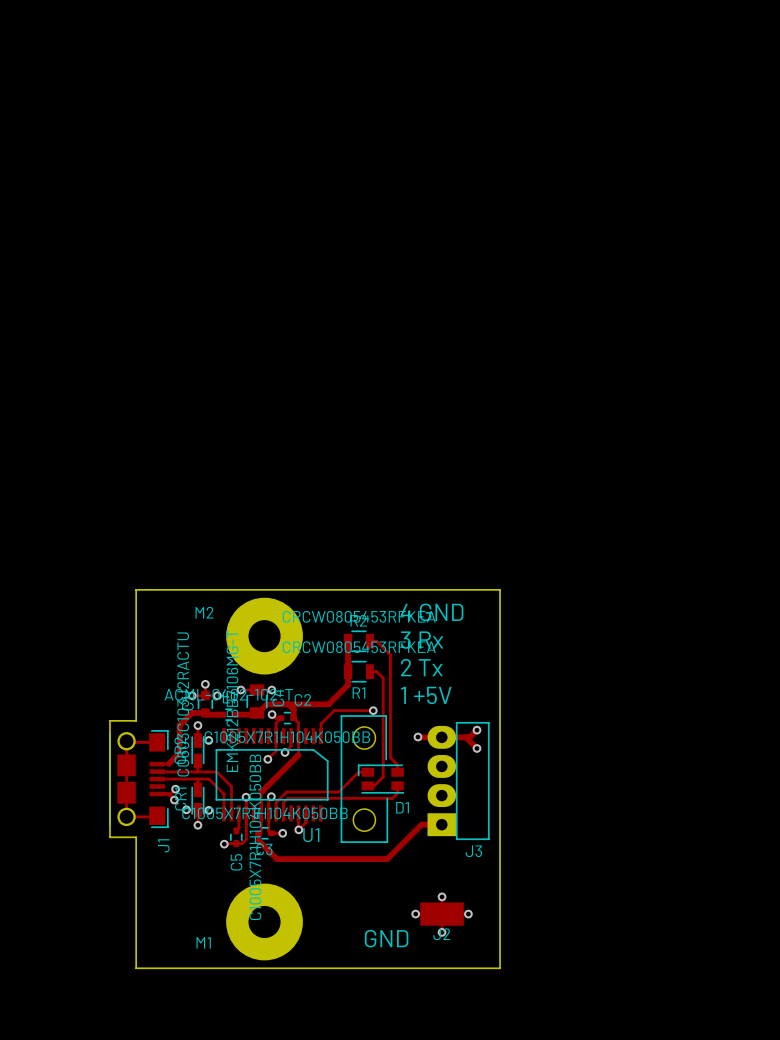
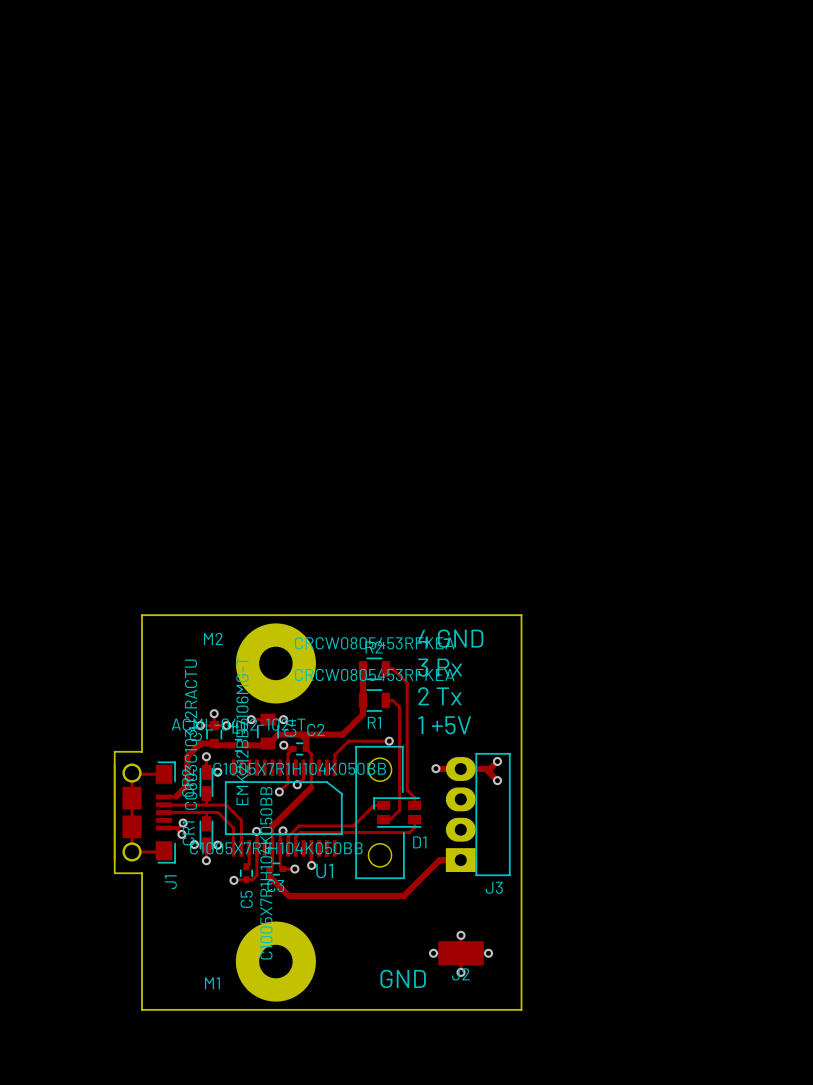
track: (305, 813) (305, 822) (298, 829) -> none

